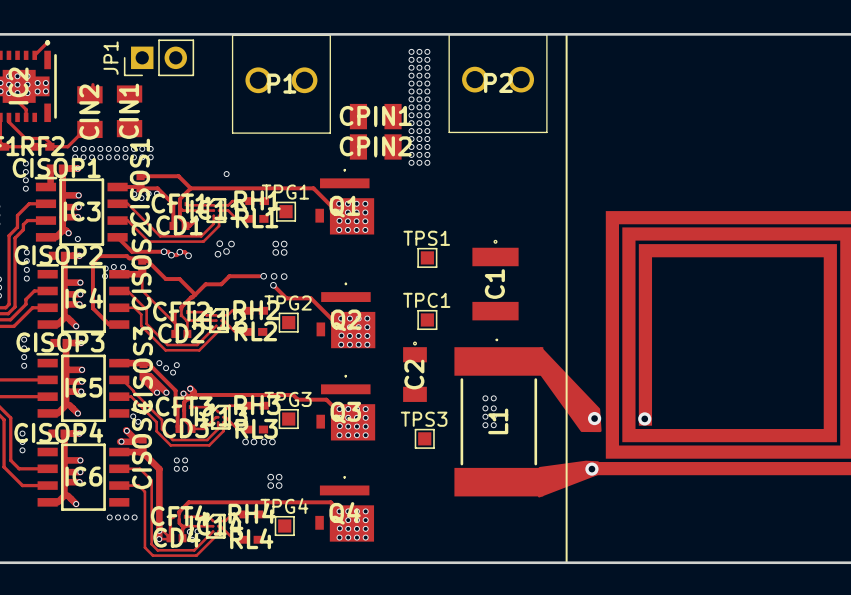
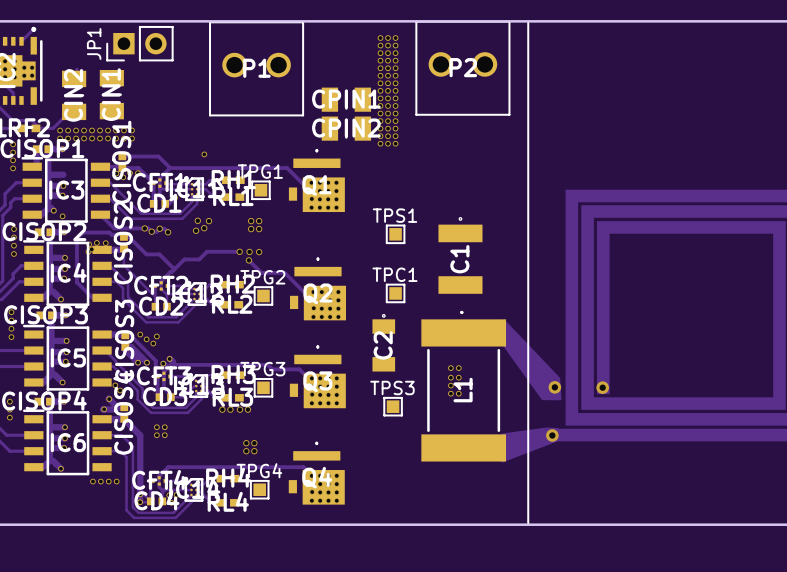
via: (78, 195) -> none
via: none -> (91, 249)

